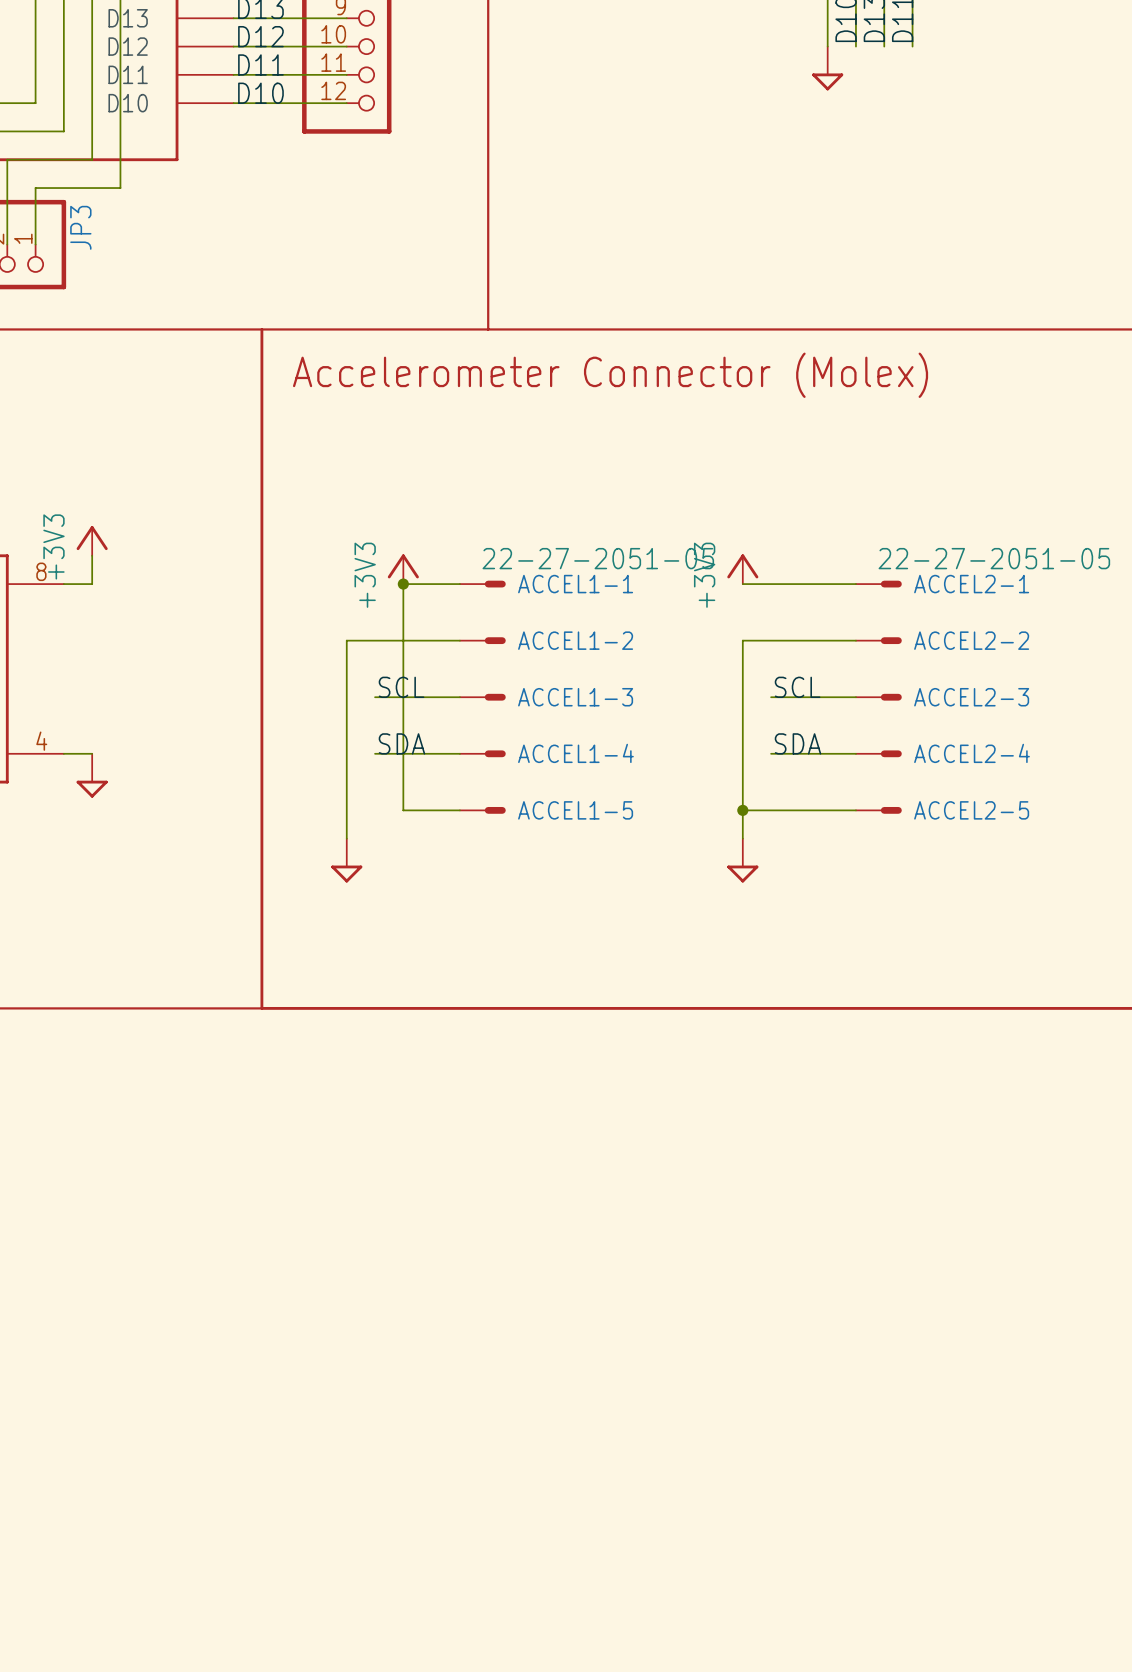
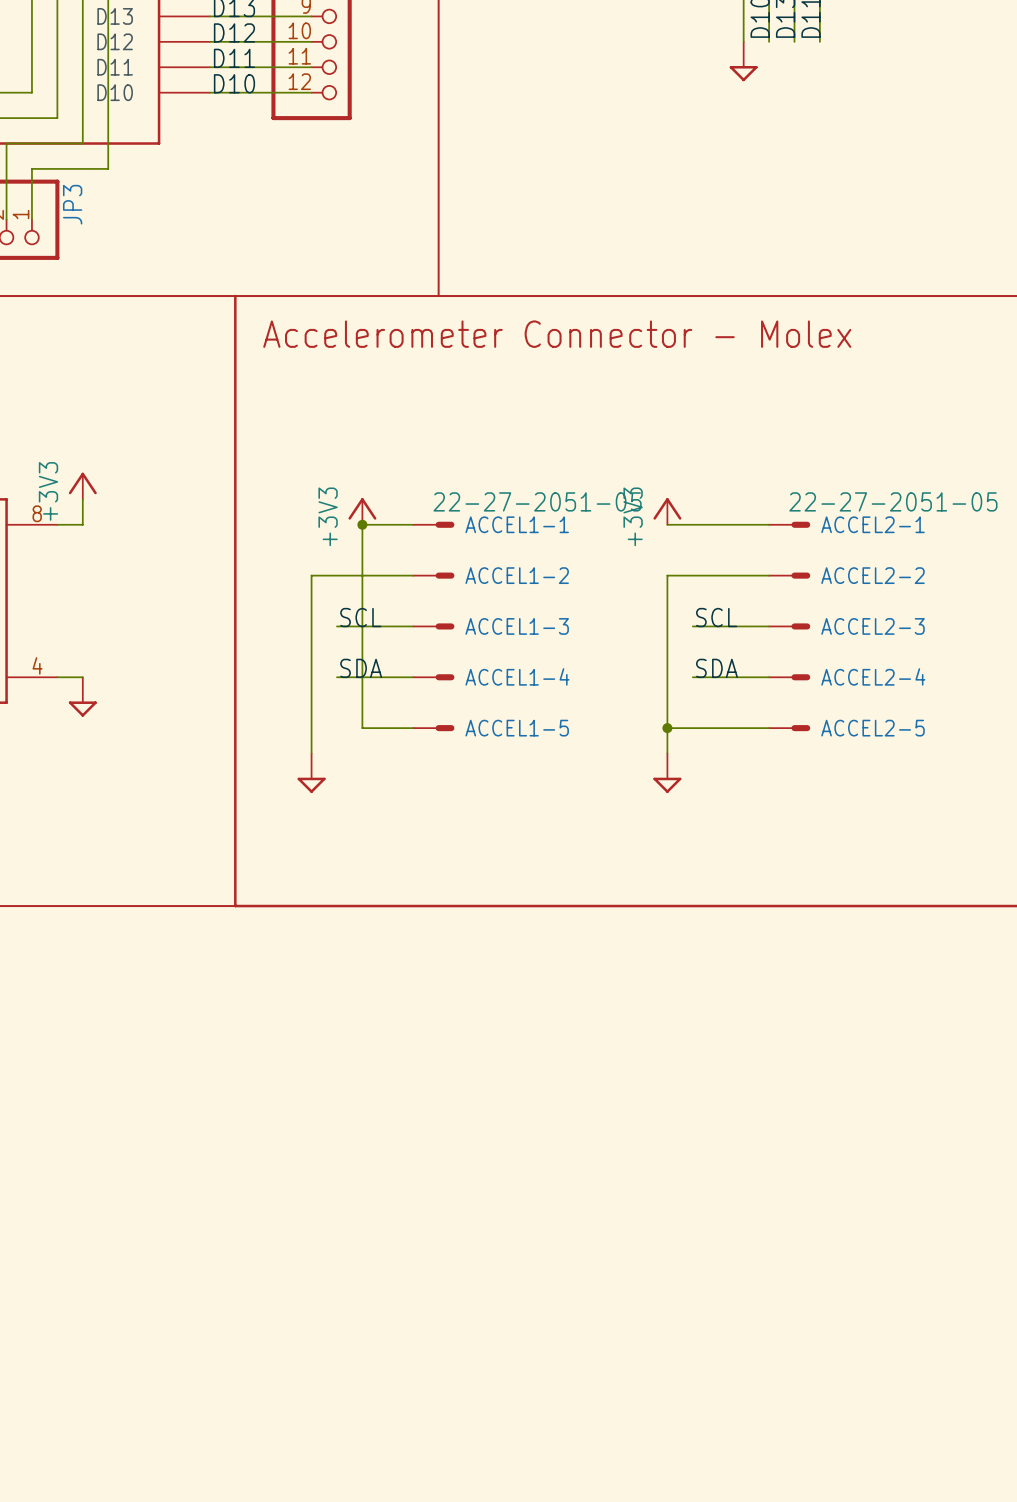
text: Accelerometer Connector (Molex) (610, 375) -> Accelerometer Connector - Molex (557, 334)

